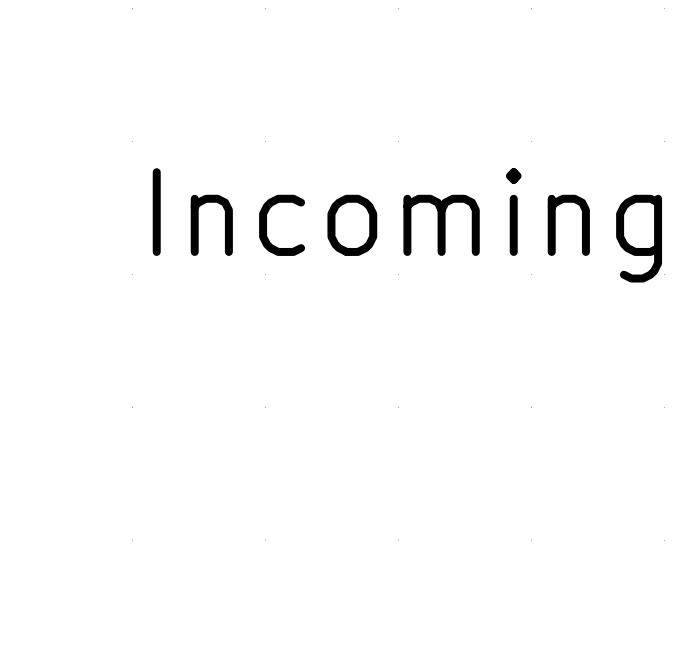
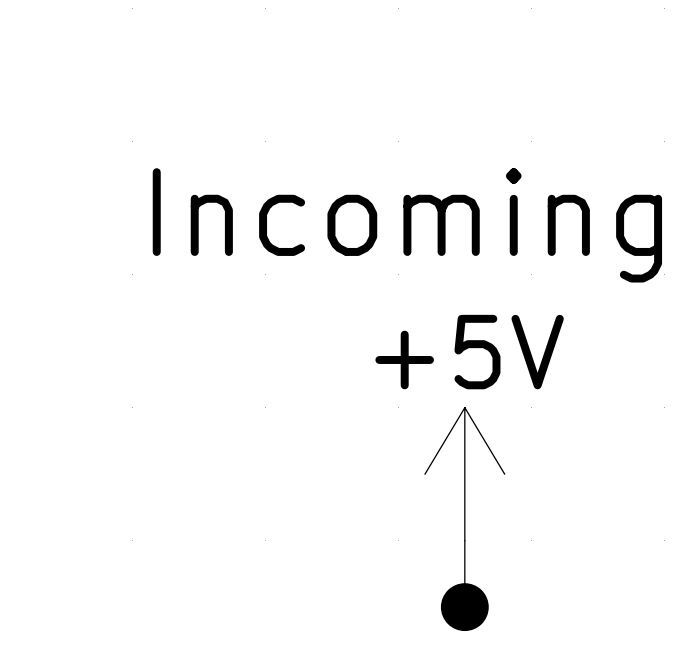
power symbol: none -> +5V (464, 474)
wire: none -> (464, 540) (464, 607)
junction: none -> (464, 607)

